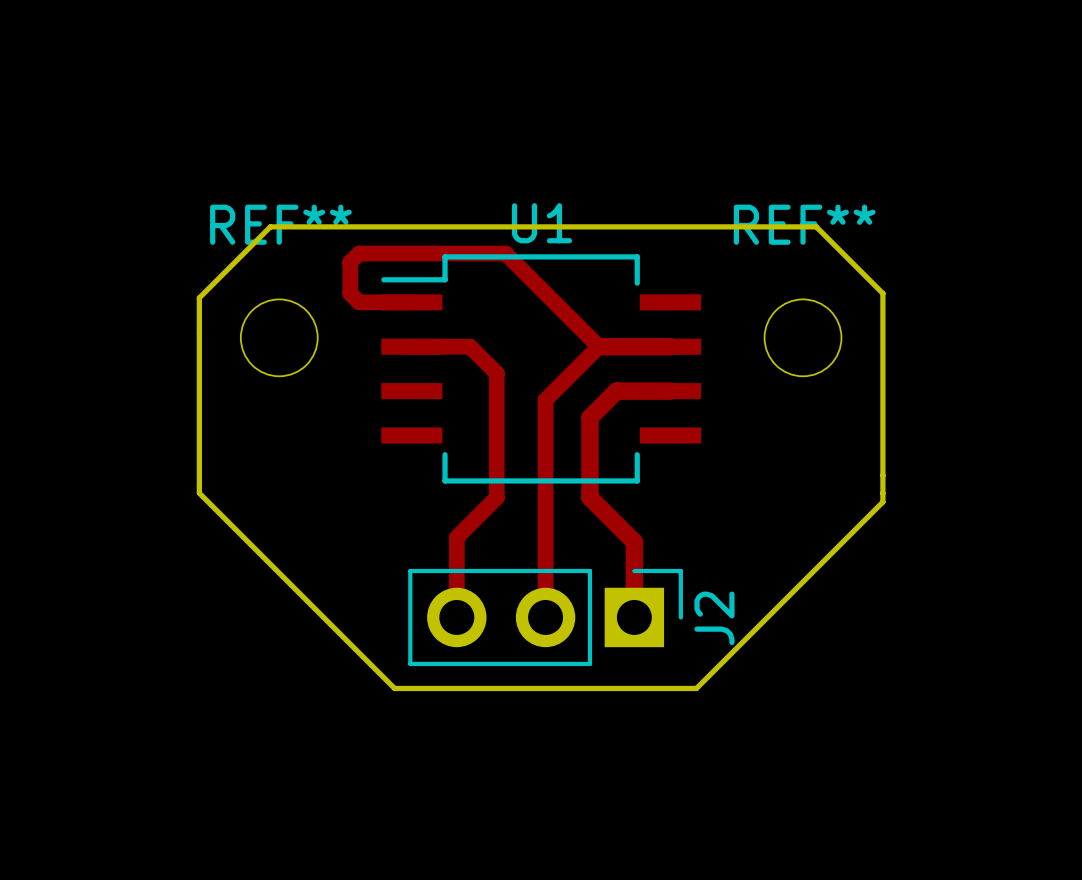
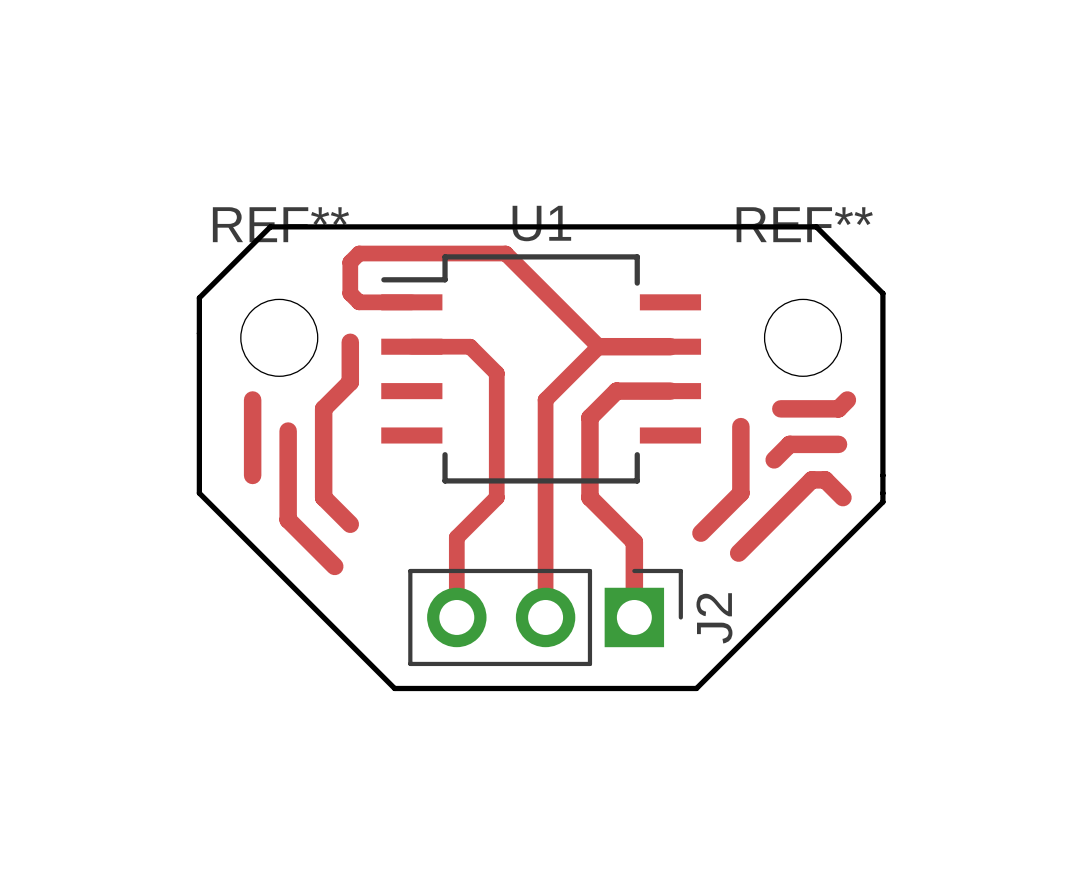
track: none -> (350, 342) (350, 382) (323, 408) (323, 497) (350, 524)
track: none -> (252, 399) (252, 475)
track: none -> (847, 399) (838, 408) (780, 408)
track: none -> (740, 426) (740, 493) (700, 533)
track: none -> (288, 431) (288, 519) (334, 566)
track: none -> (838, 444) (789, 444) (774, 459)
track: none -> (842, 497) (825, 479) (811, 479) (738, 553)

